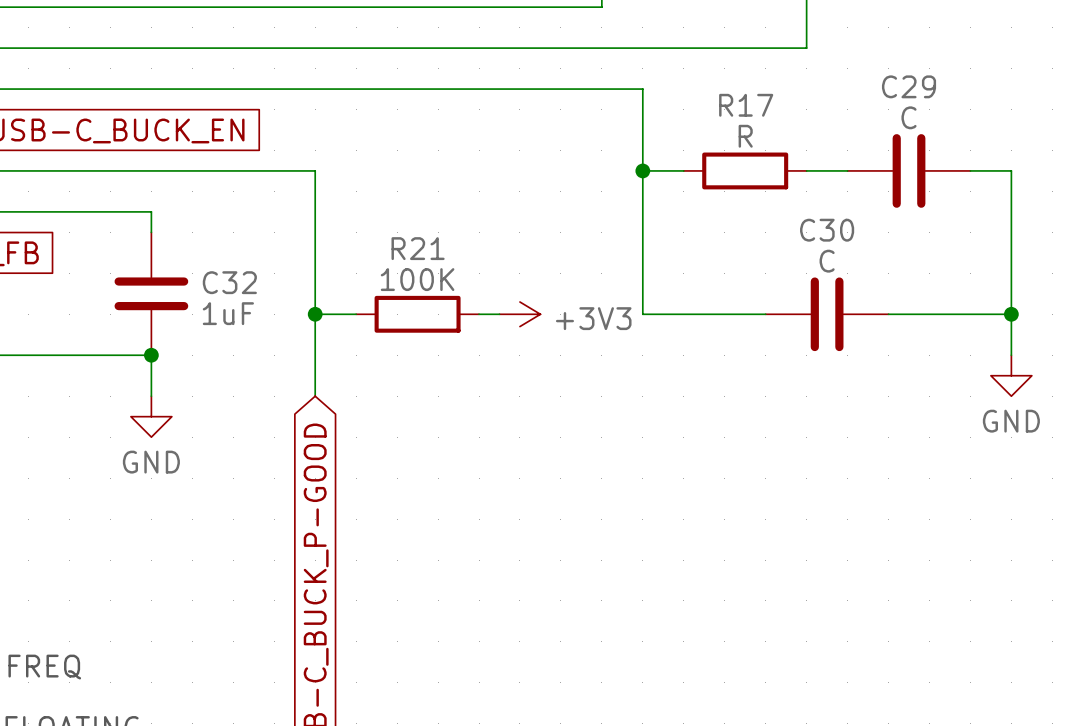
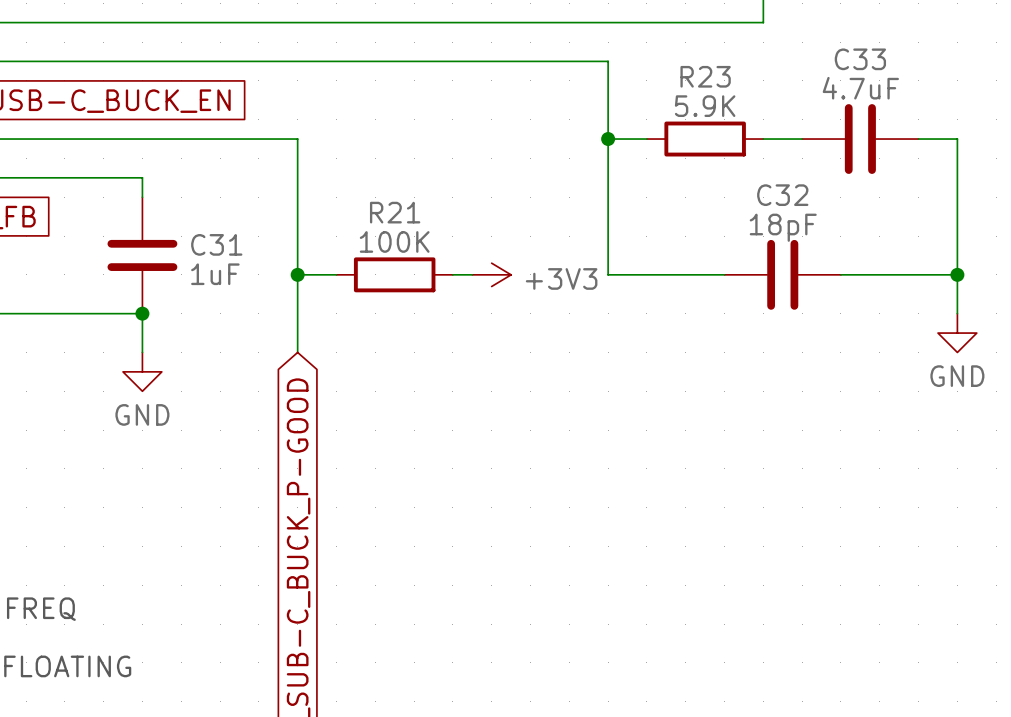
C29 name: C29 (909, 86) -> C33 (860, 59)
R17 name: R17 (746, 105) -> R23 (705, 76)
C29 value: C (909, 117) -> 4.7uF (860, 88)
R17 value: R (745, 136) -> 5.9K (705, 106)
C30 name: C30 (827, 230) -> C32 (782, 195)
C30 value: C (827, 261) -> 18pF (783, 227)
C32 name: C32 (229, 282) -> C31 (216, 244)

